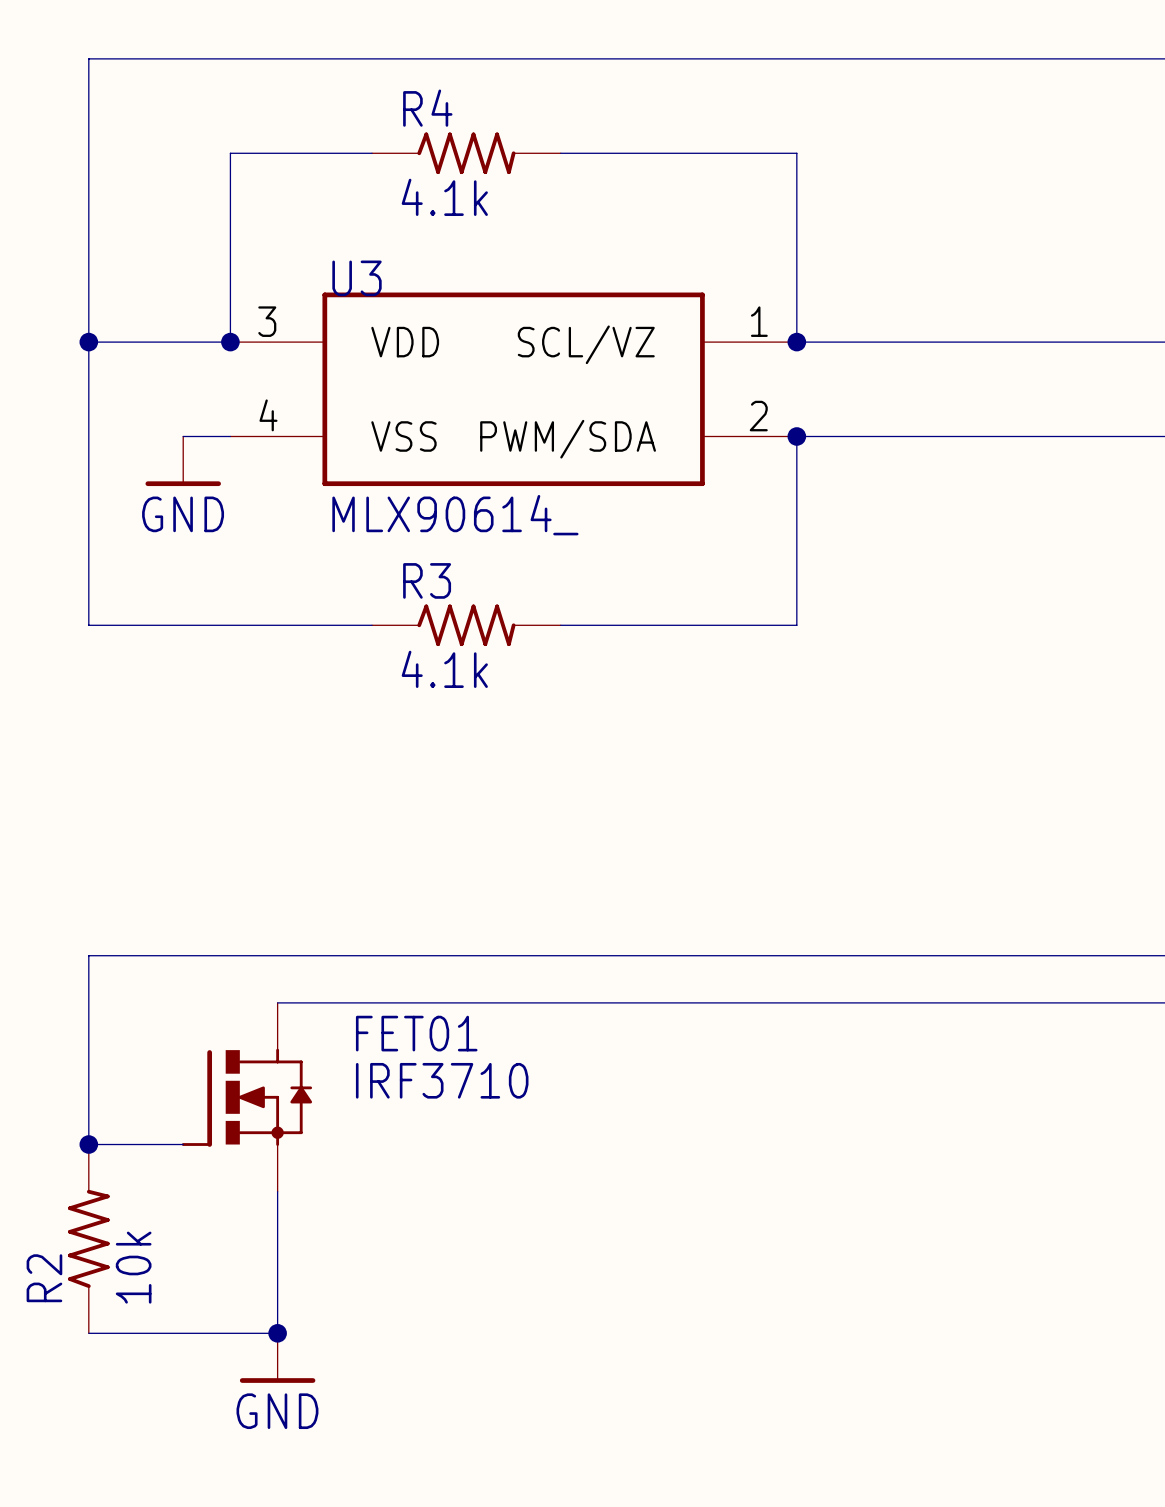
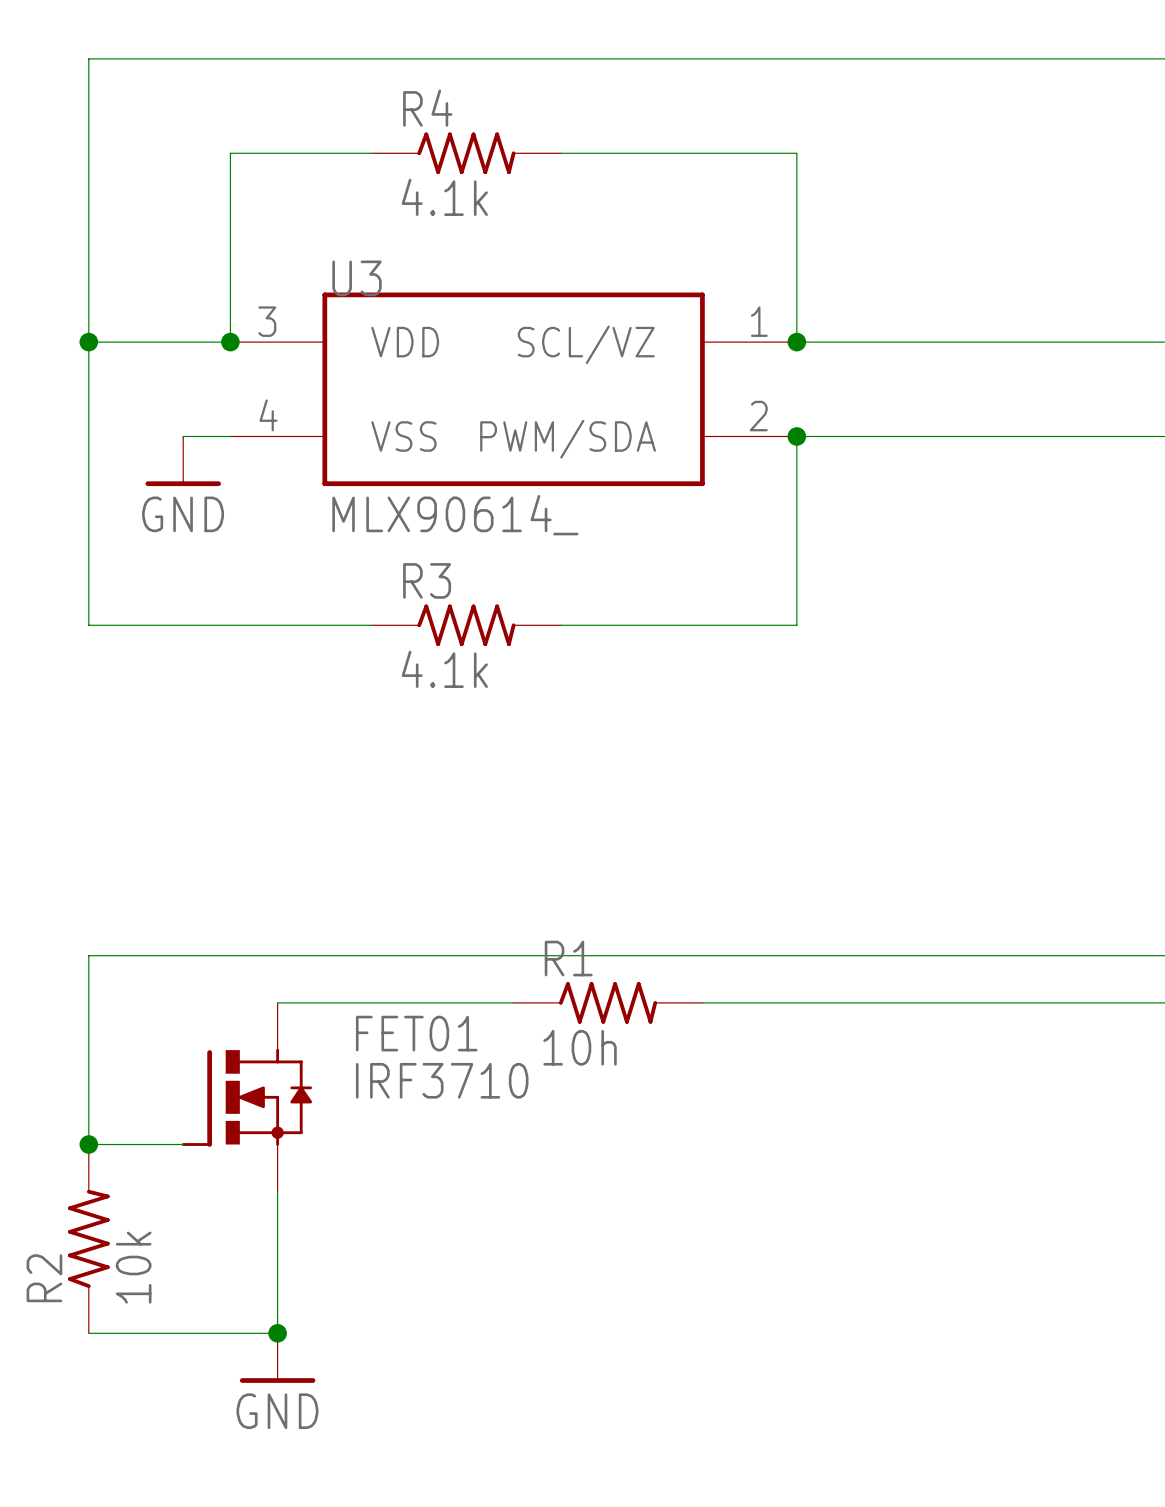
R1: none -> 10h (608, 1002)

